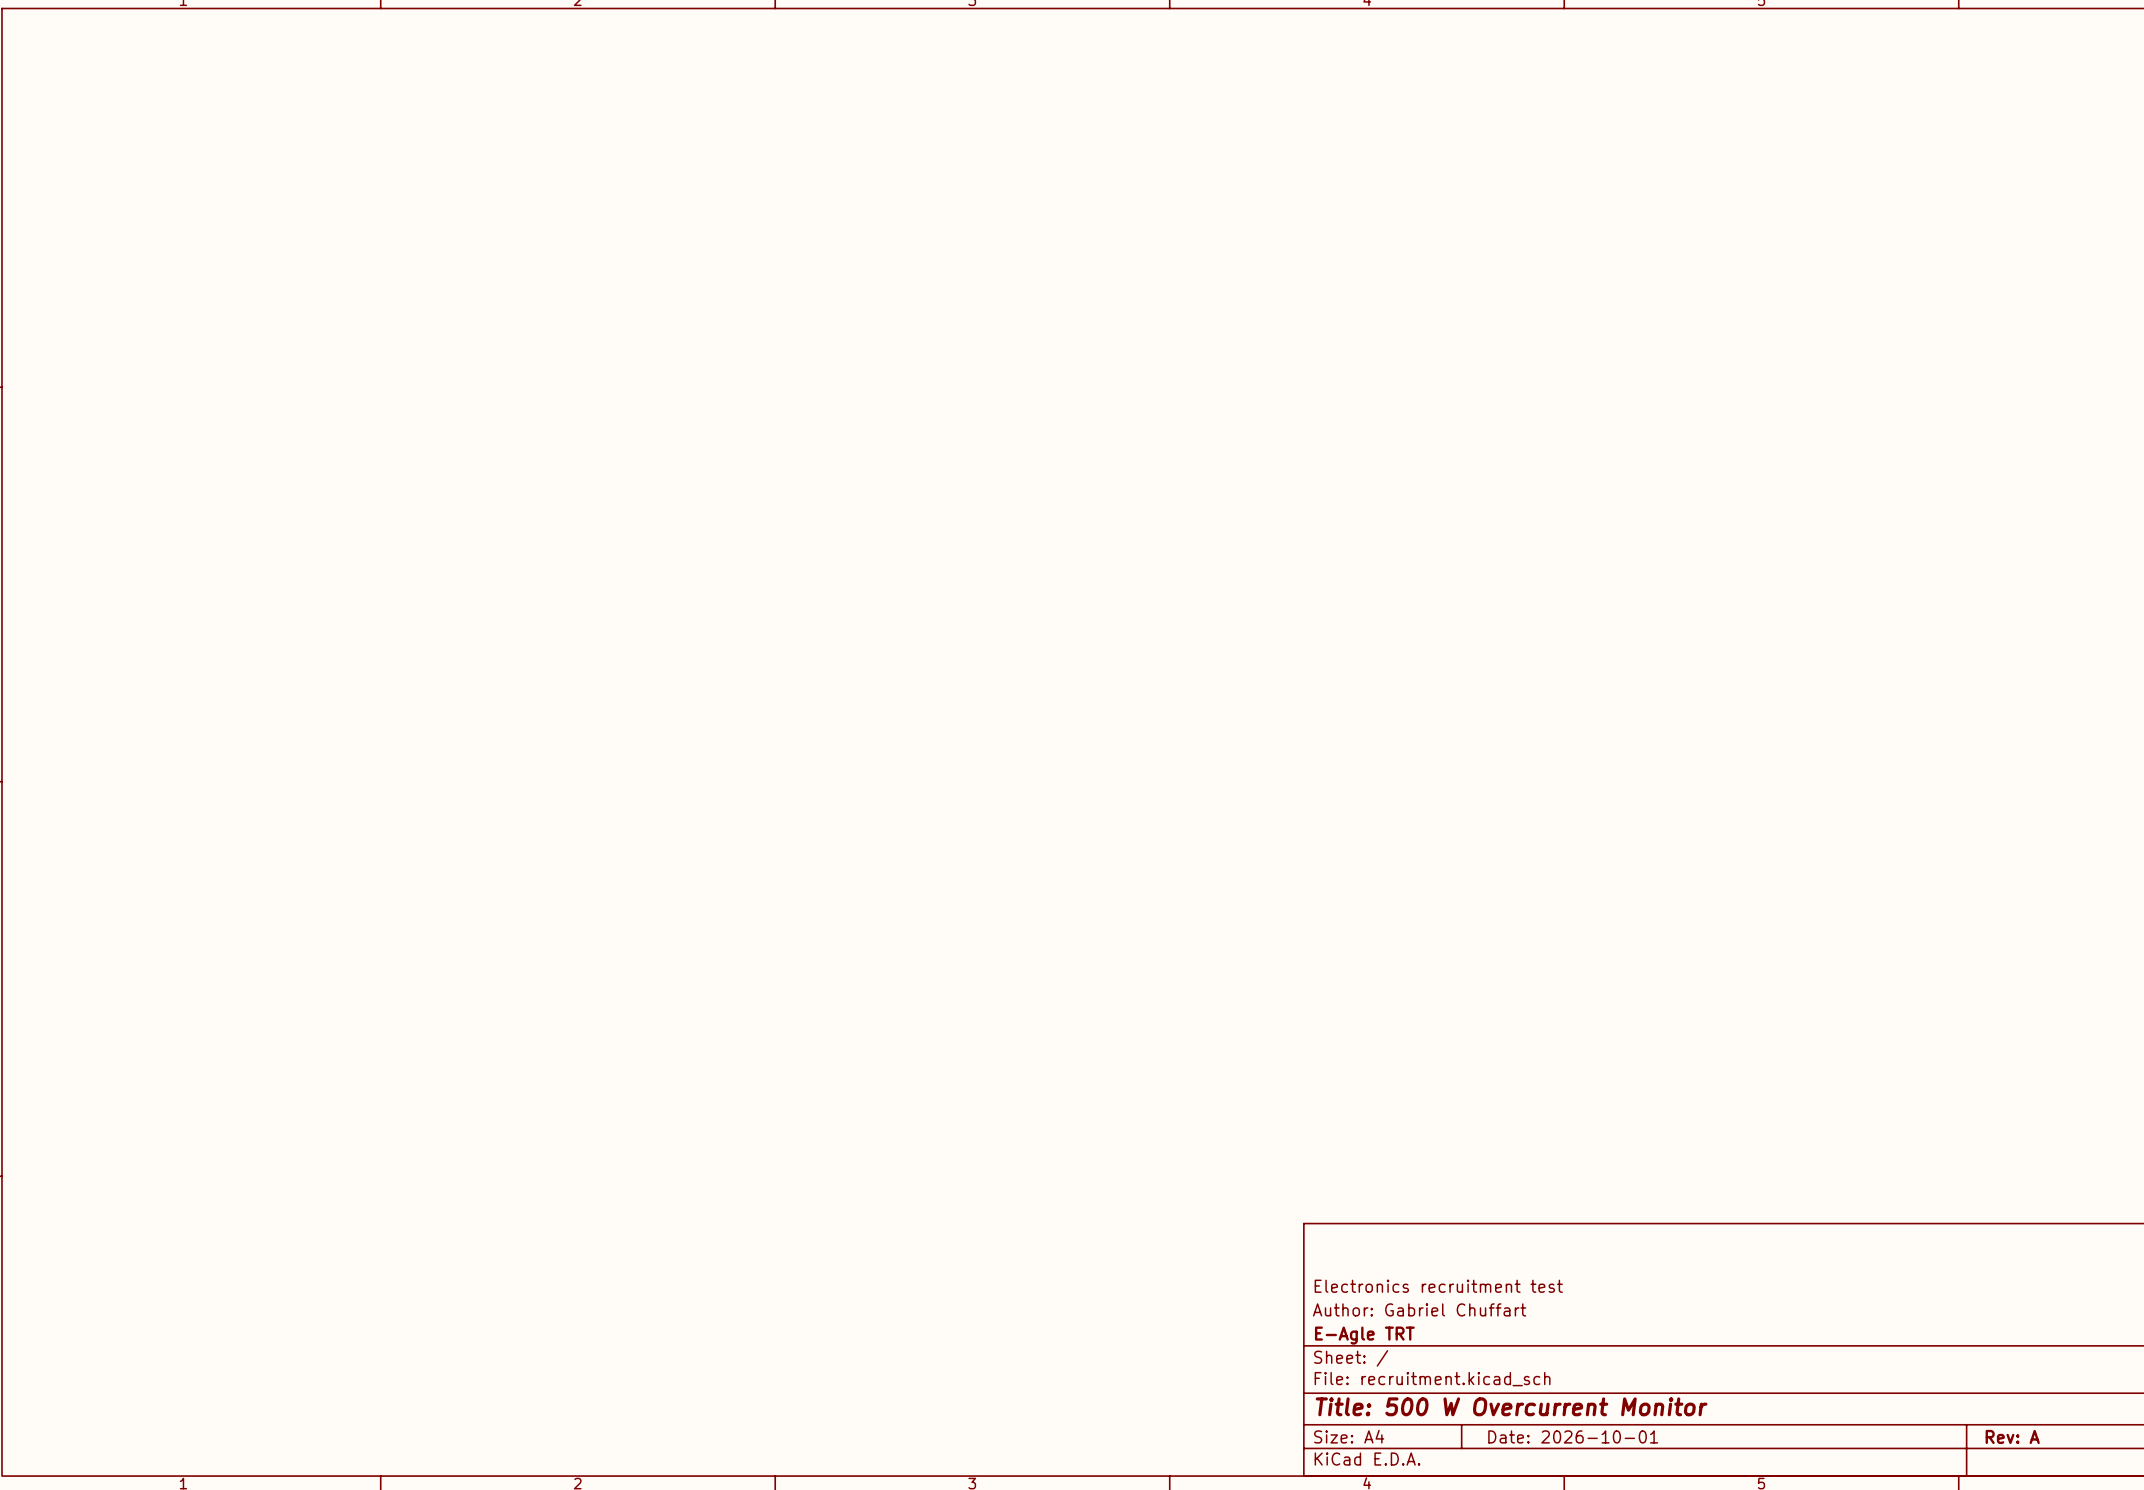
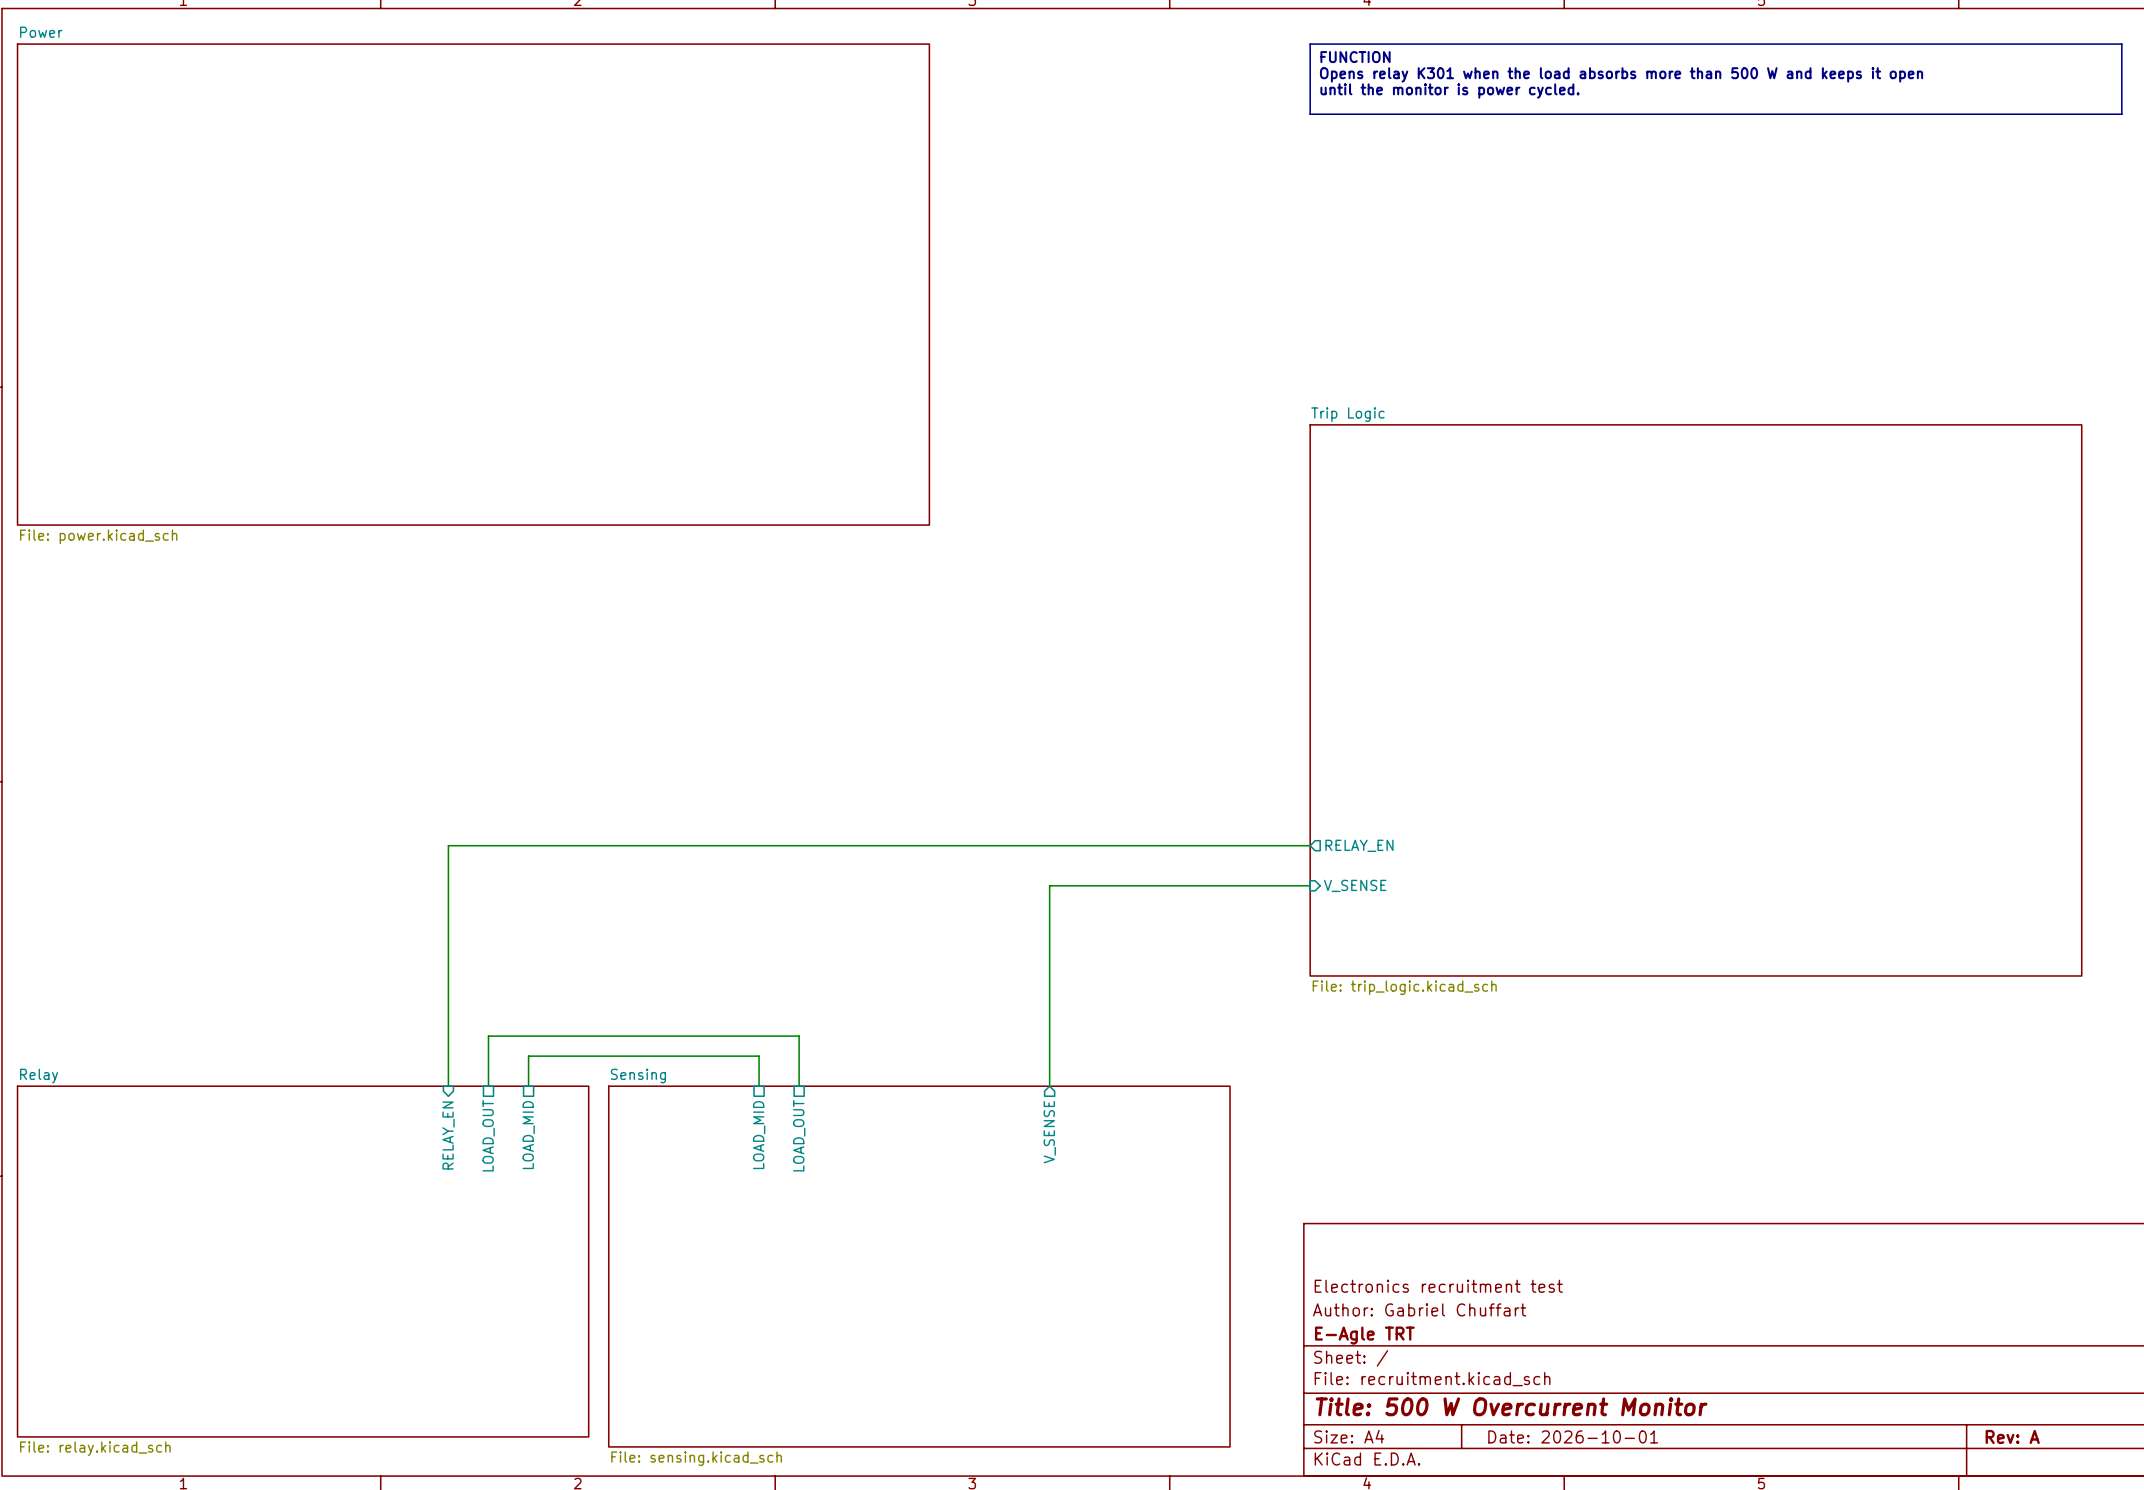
line: none -> (1310, 44) (2121, 44) (2121, 114) (1310, 114) (1310, 44)
text: none -> FUNCTION (1355, 57)
text: none -> Opens relay K301 when the load absorbs more than 500 W and keeps it open (1621, 74)
text: none -> until the monitor is power cycled. (1449, 91)
sheet Power: none -> File: power.kicad_sch (473, 284)
sheet Trip Logic: none -> File: trip_logic.kicad_sch (1695, 700)
wire: none -> (1310, 845) (448, 845) (448, 1086)
sheet pin: none -> RELAY_EN (1359, 845)
wire: none -> (1310, 885) (1049, 885) (1049, 1086)
sheet pin: none -> V_SENSE (1355, 885)
wire: none -> (488, 1086) (488, 1036) (799, 1036) (799, 1086)
wire: none -> (528, 1086) (528, 1056) (759, 1056) (759, 1086)
sheet pin: none -> V_SENSE (1049, 1132)
sheet pin: none -> RELAY_EN (448, 1135)
sheet pin: none -> LOAD_OUT (488, 1135)
sheet pin: none -> LOAD_MID (528, 1135)
sheet pin: none -> LOAD_MID (759, 1135)
sheet pin: none -> LOAD_OUT (799, 1135)
sheet Relay: none -> File: relay.kicad_sch (303, 1261)
sheet Sensing: none -> File: sensing.kicad_sch (919, 1266)

